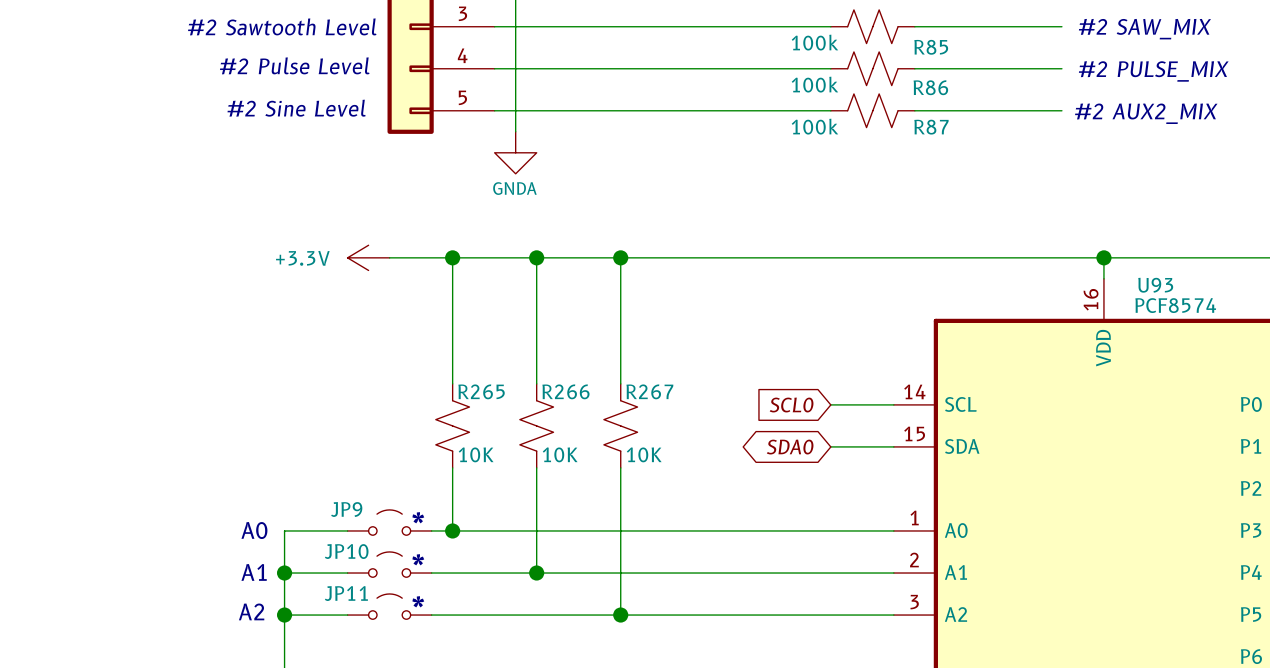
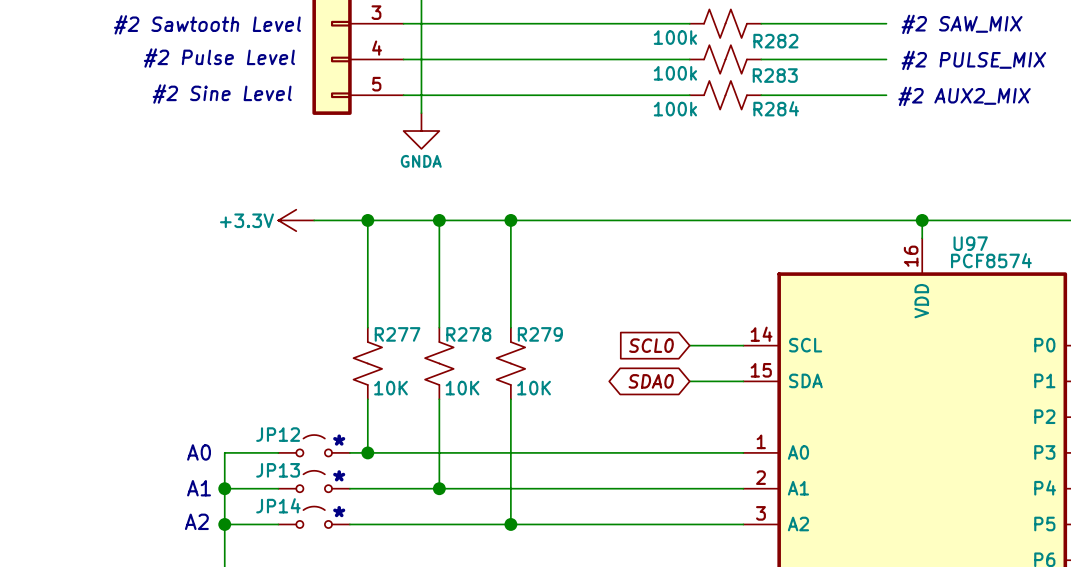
R85 name: R85 (931, 47) -> R282 (775, 41)
R86 name: R86 (930, 87) -> R283 (775, 75)
R87 name: R87 (931, 127) -> R284 (776, 108)
U93 name: U93 (1155, 285) -> U97 (970, 243)
R265 name: R265 (481, 391) -> R277 (397, 334)
R266 name: R266 (565, 391) -> R278 (468, 334)
R267 name: R267 (649, 391) -> R279 (540, 334)
JP9 name: JP9 (346, 509) -> JP12 (278, 434)
JP10 name: JP10 (346, 551) -> JP13 (278, 470)
JP11 name: JP11 (346, 593) -> JP14 (278, 505)

